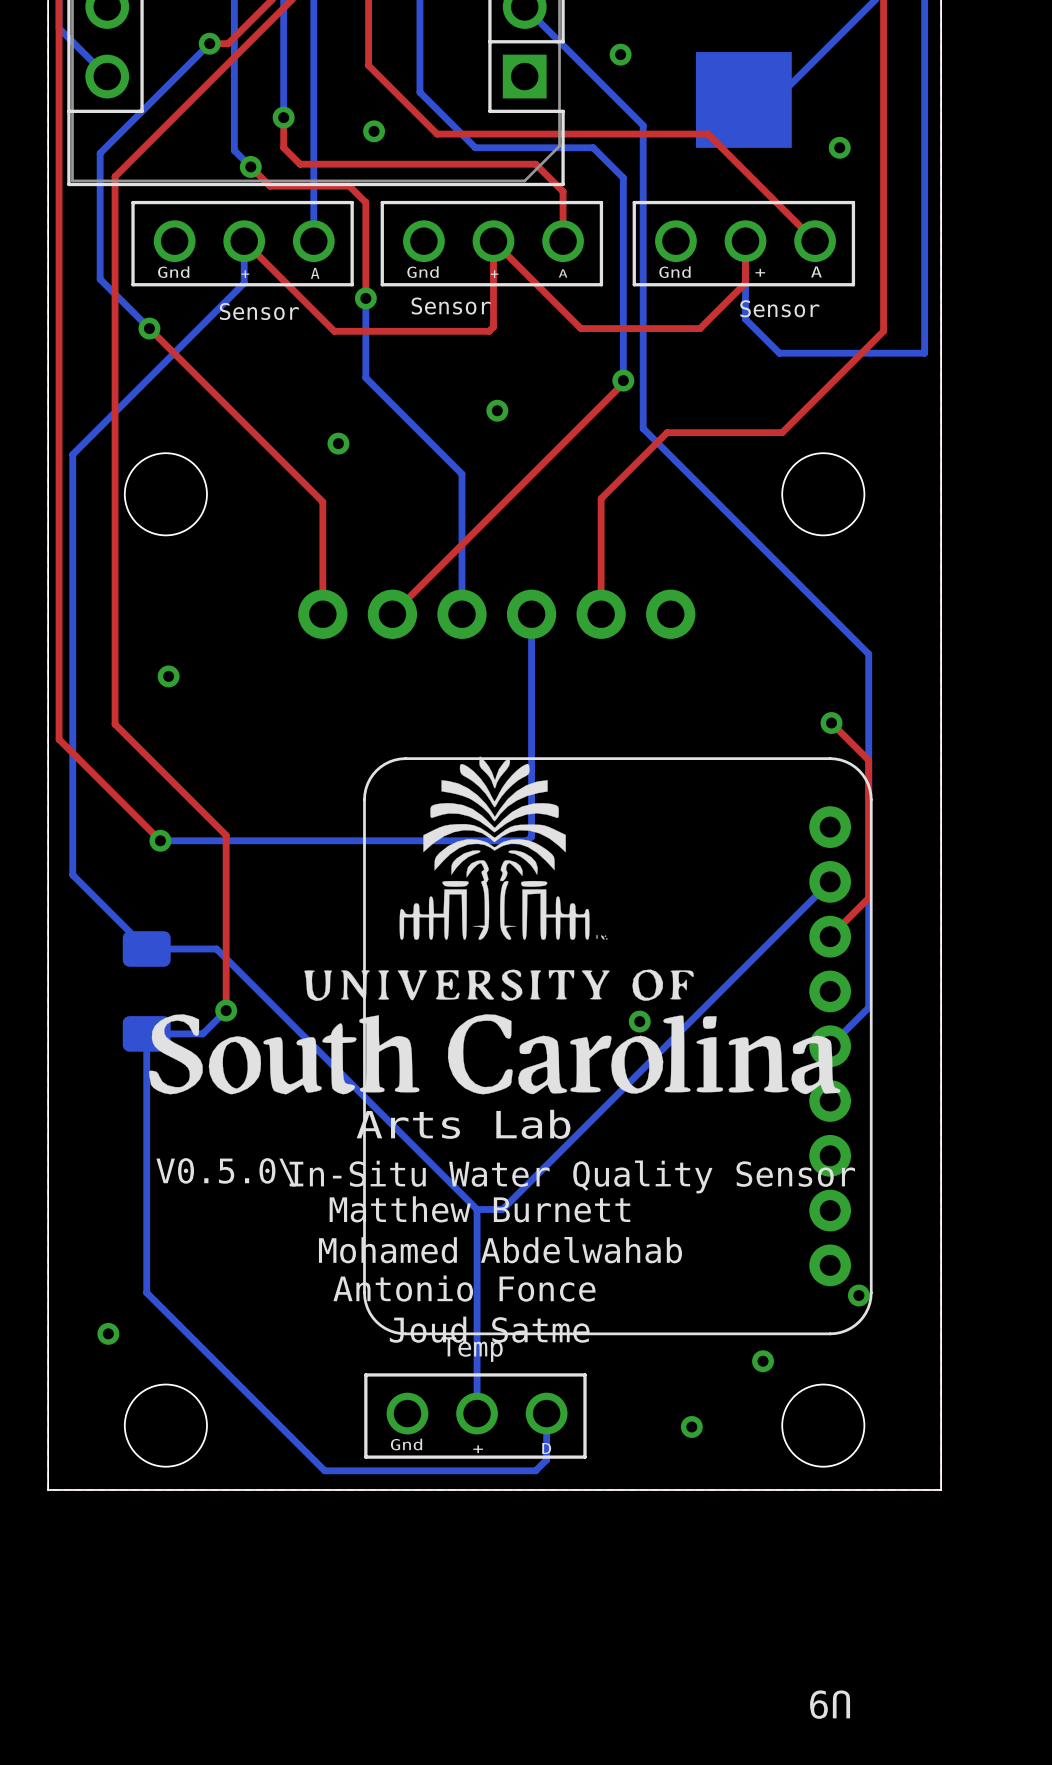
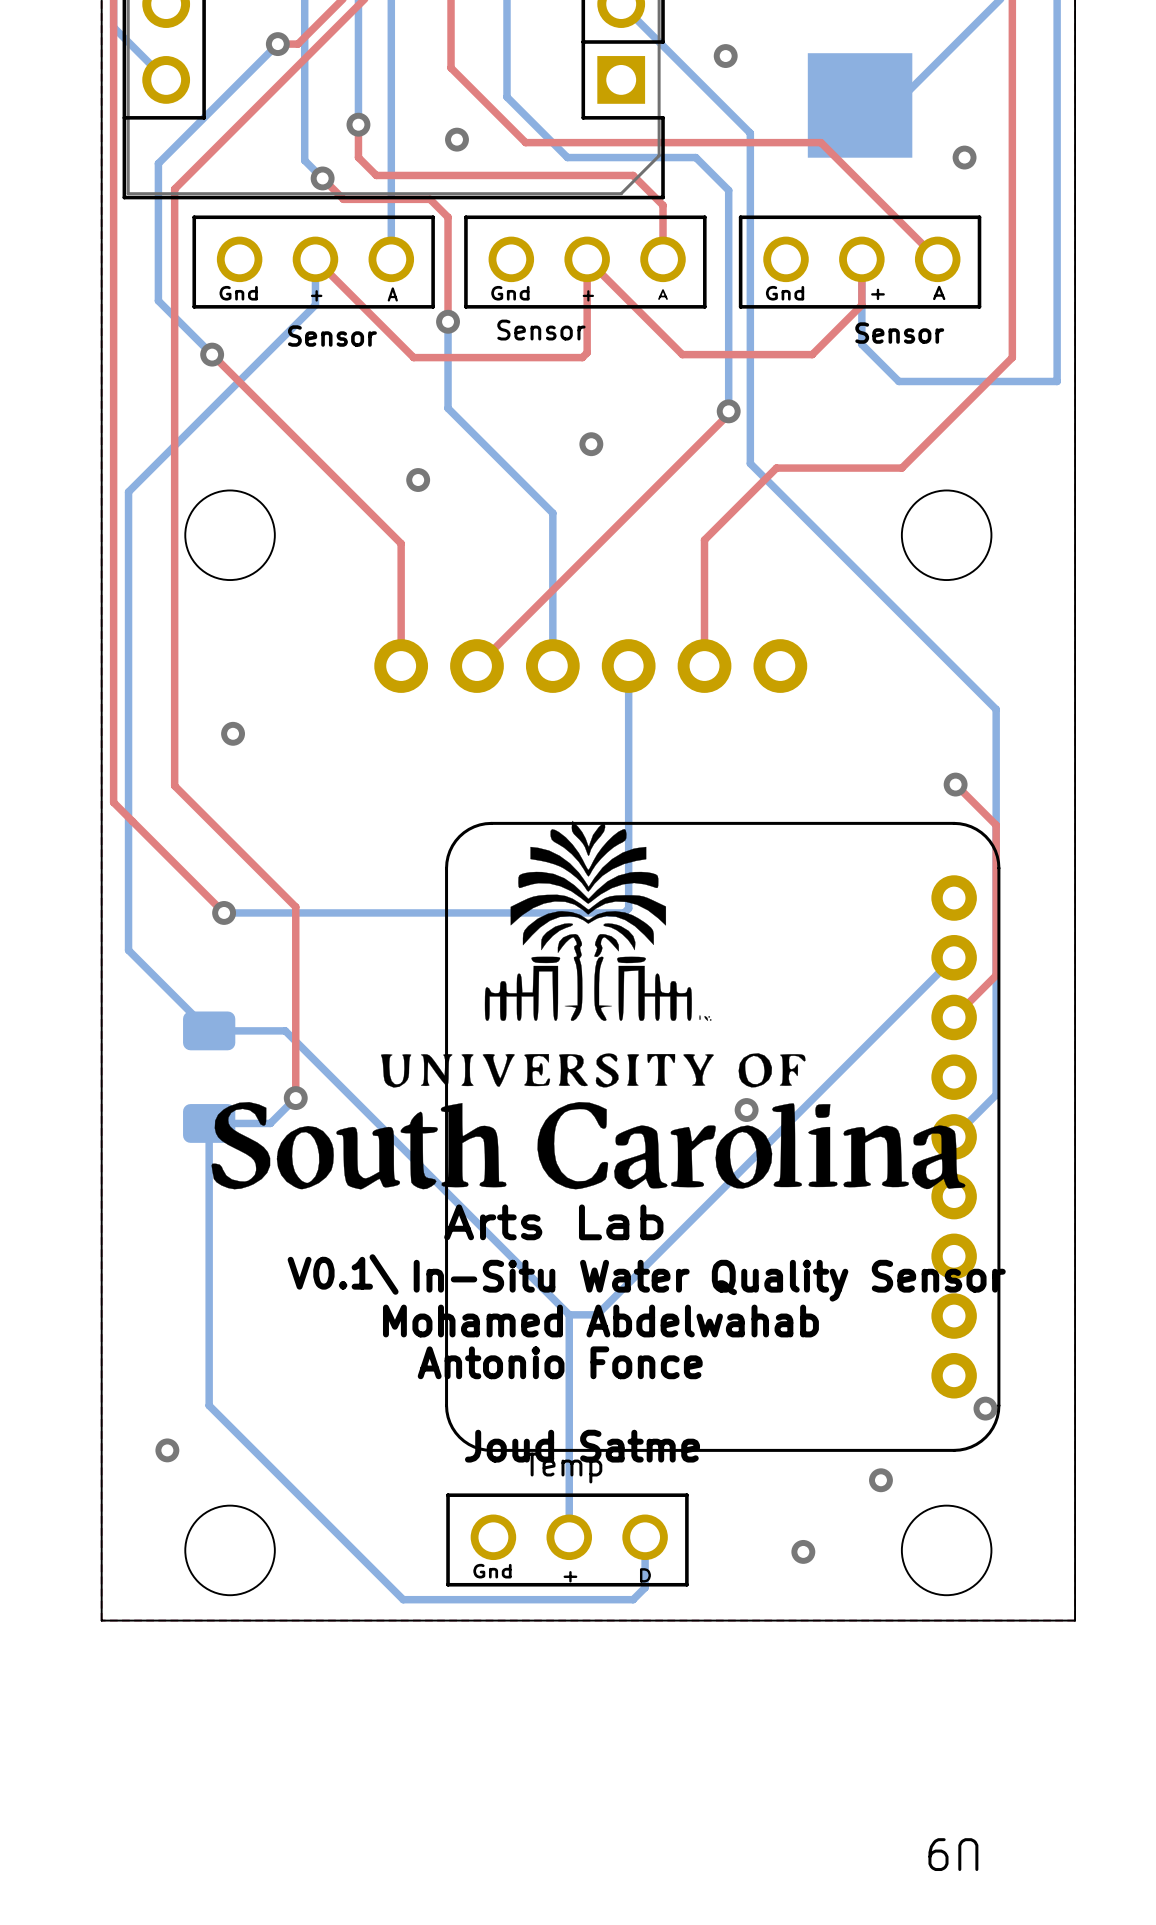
text: V0.5.0\ (225, 1172) -> V0.1\ (343, 1274)
text position: In-Situ Water Quality Sensor (572, 1176) -> In-Situ Water Quality Sensor (709, 1280)
text: Matthew Burnett (479, 1209) -> none
text position: Mohamed Abdelwahab (500, 1250) -> Mohamed Abdelwahab (600, 1321)
text position: Antonio Fonce (464, 1288) -> Antonio Fonce (560, 1362)

